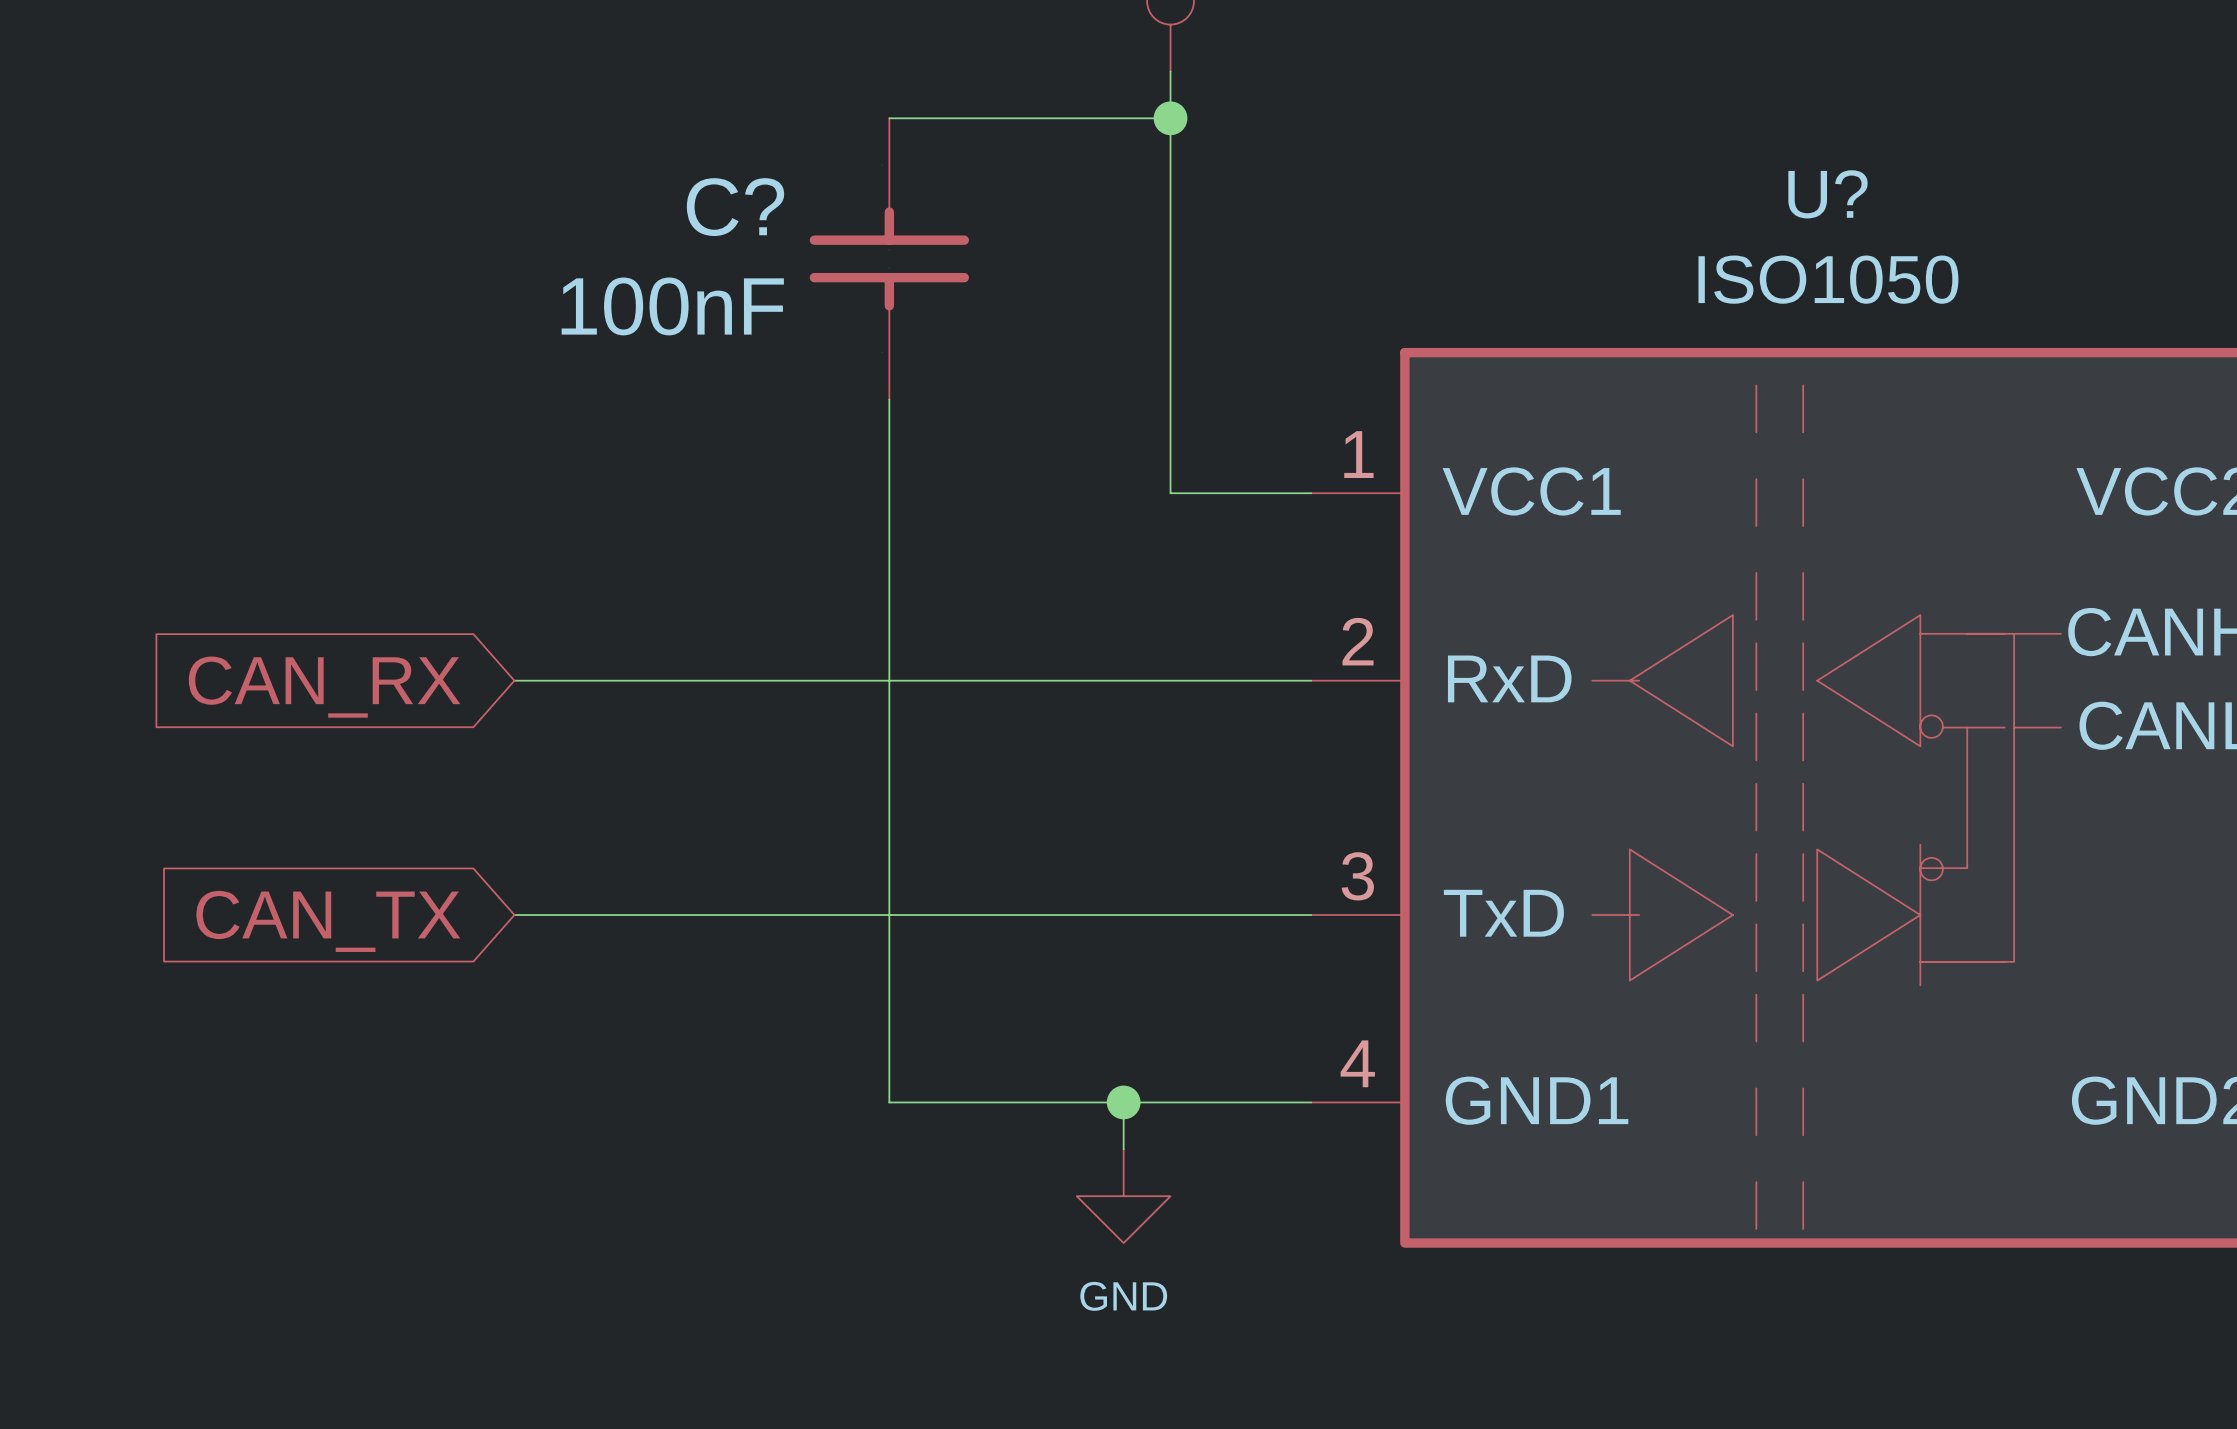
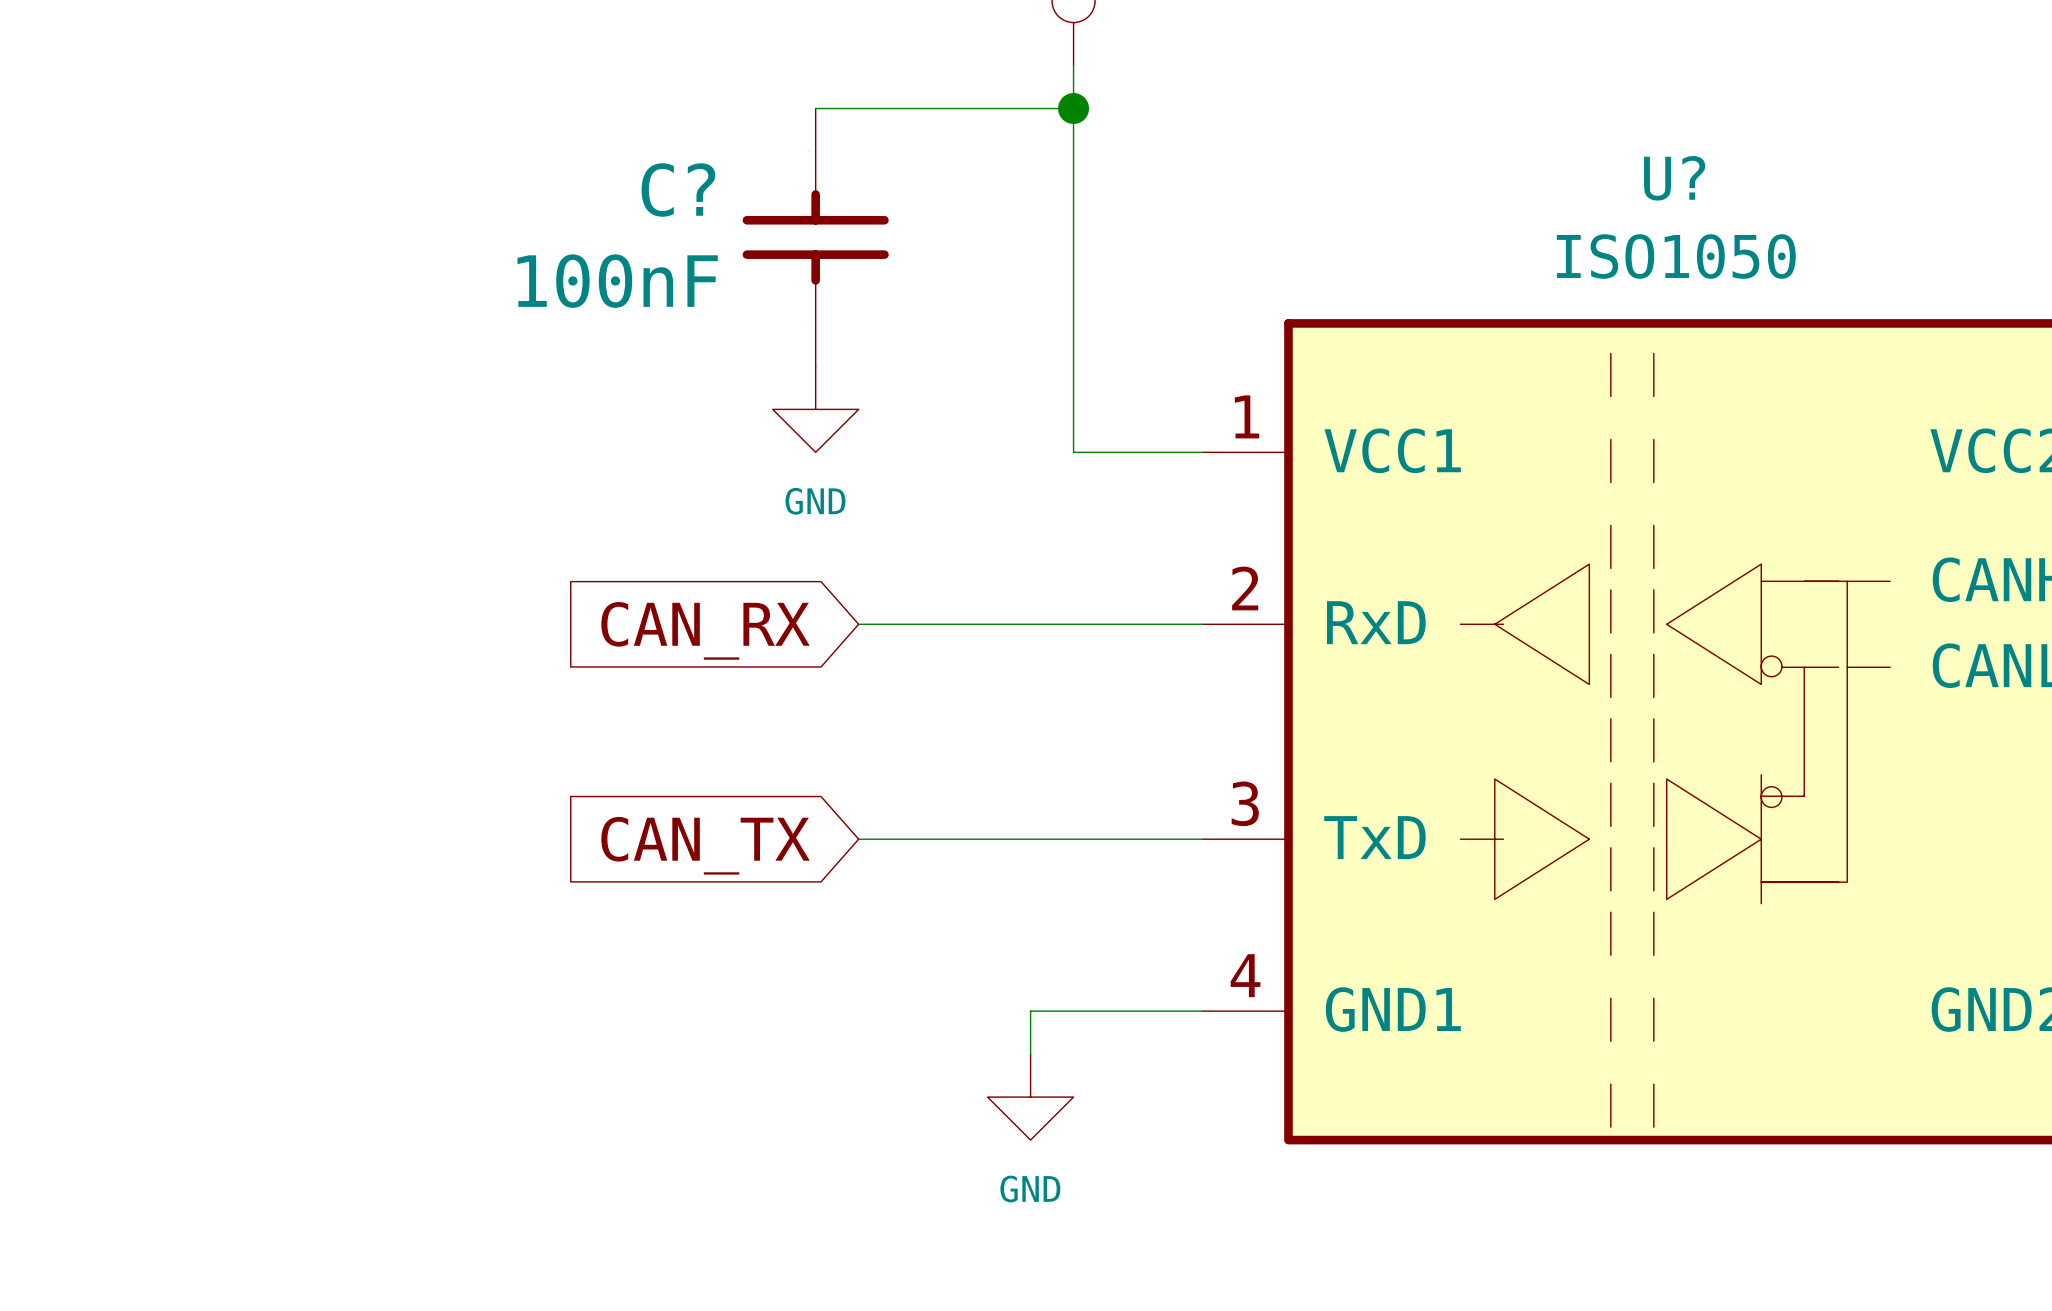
wire: (889, 399) (889, 1102) (1123, 1102) -> none
power symbol: none -> GND (815, 409)
wire: (514, 680) (936, 680) -> none
global label position: CAN_RX (324, 687) -> CAN_RX (705, 630)
wire: (514, 915) (936, 915) -> none
global label position: CAN_TX (328, 921) -> CAN_TX (705, 845)
junction: (1123, 1102) -> none

